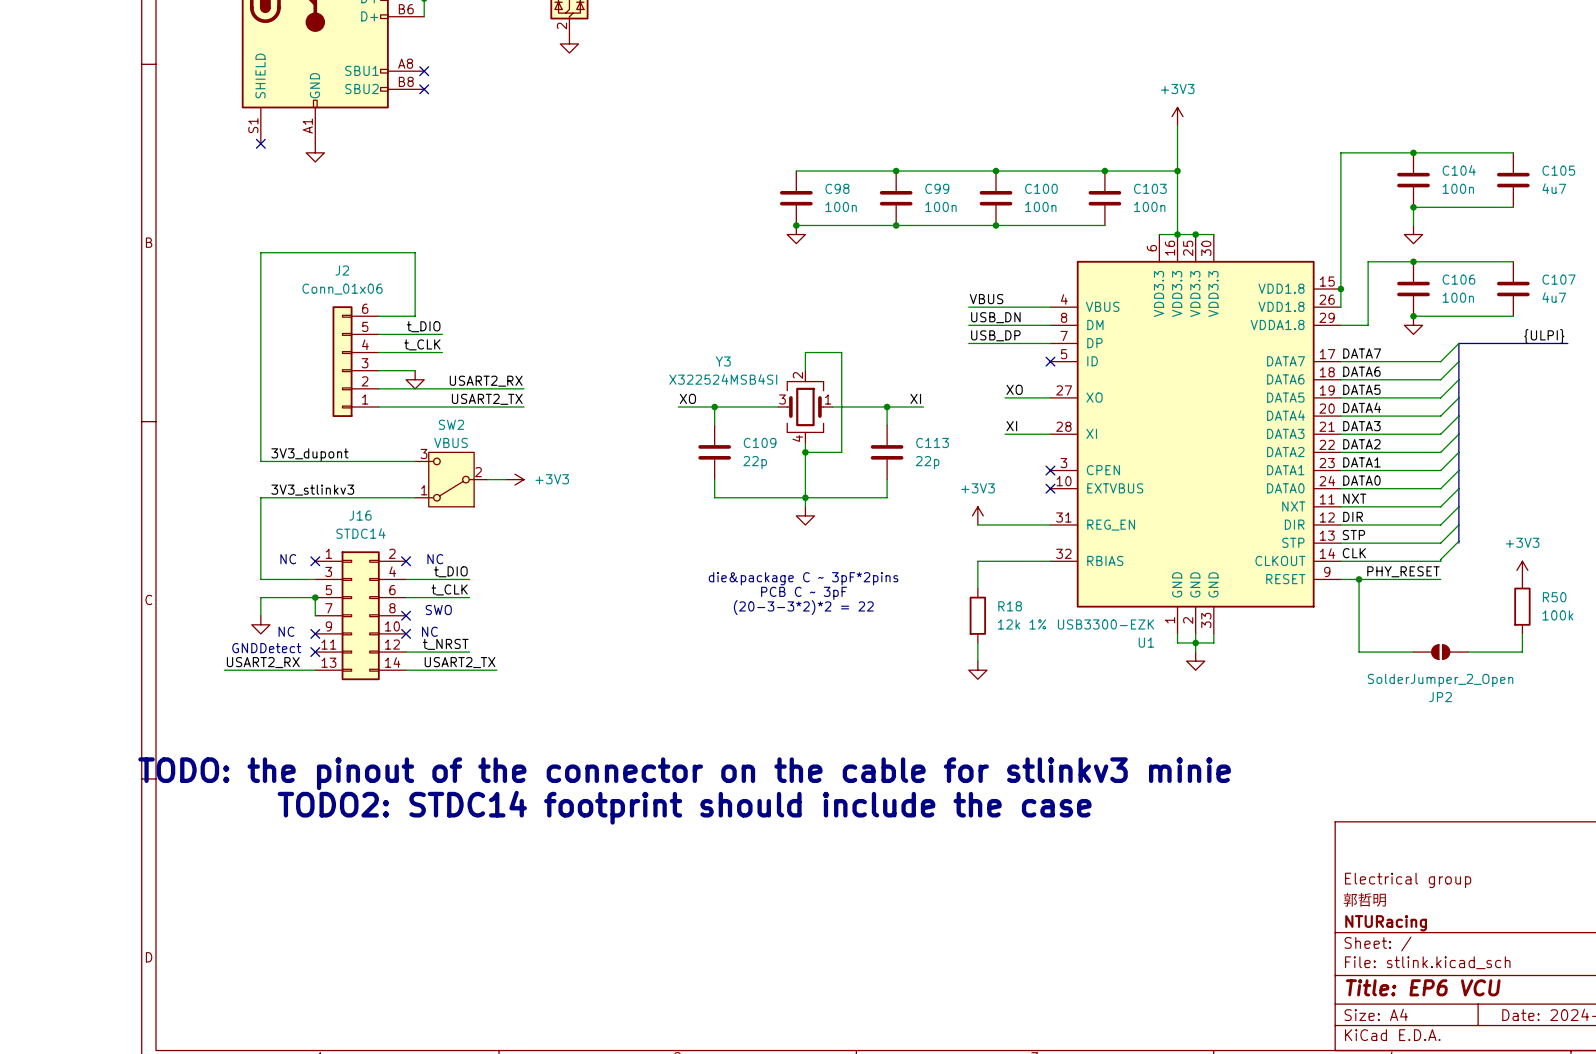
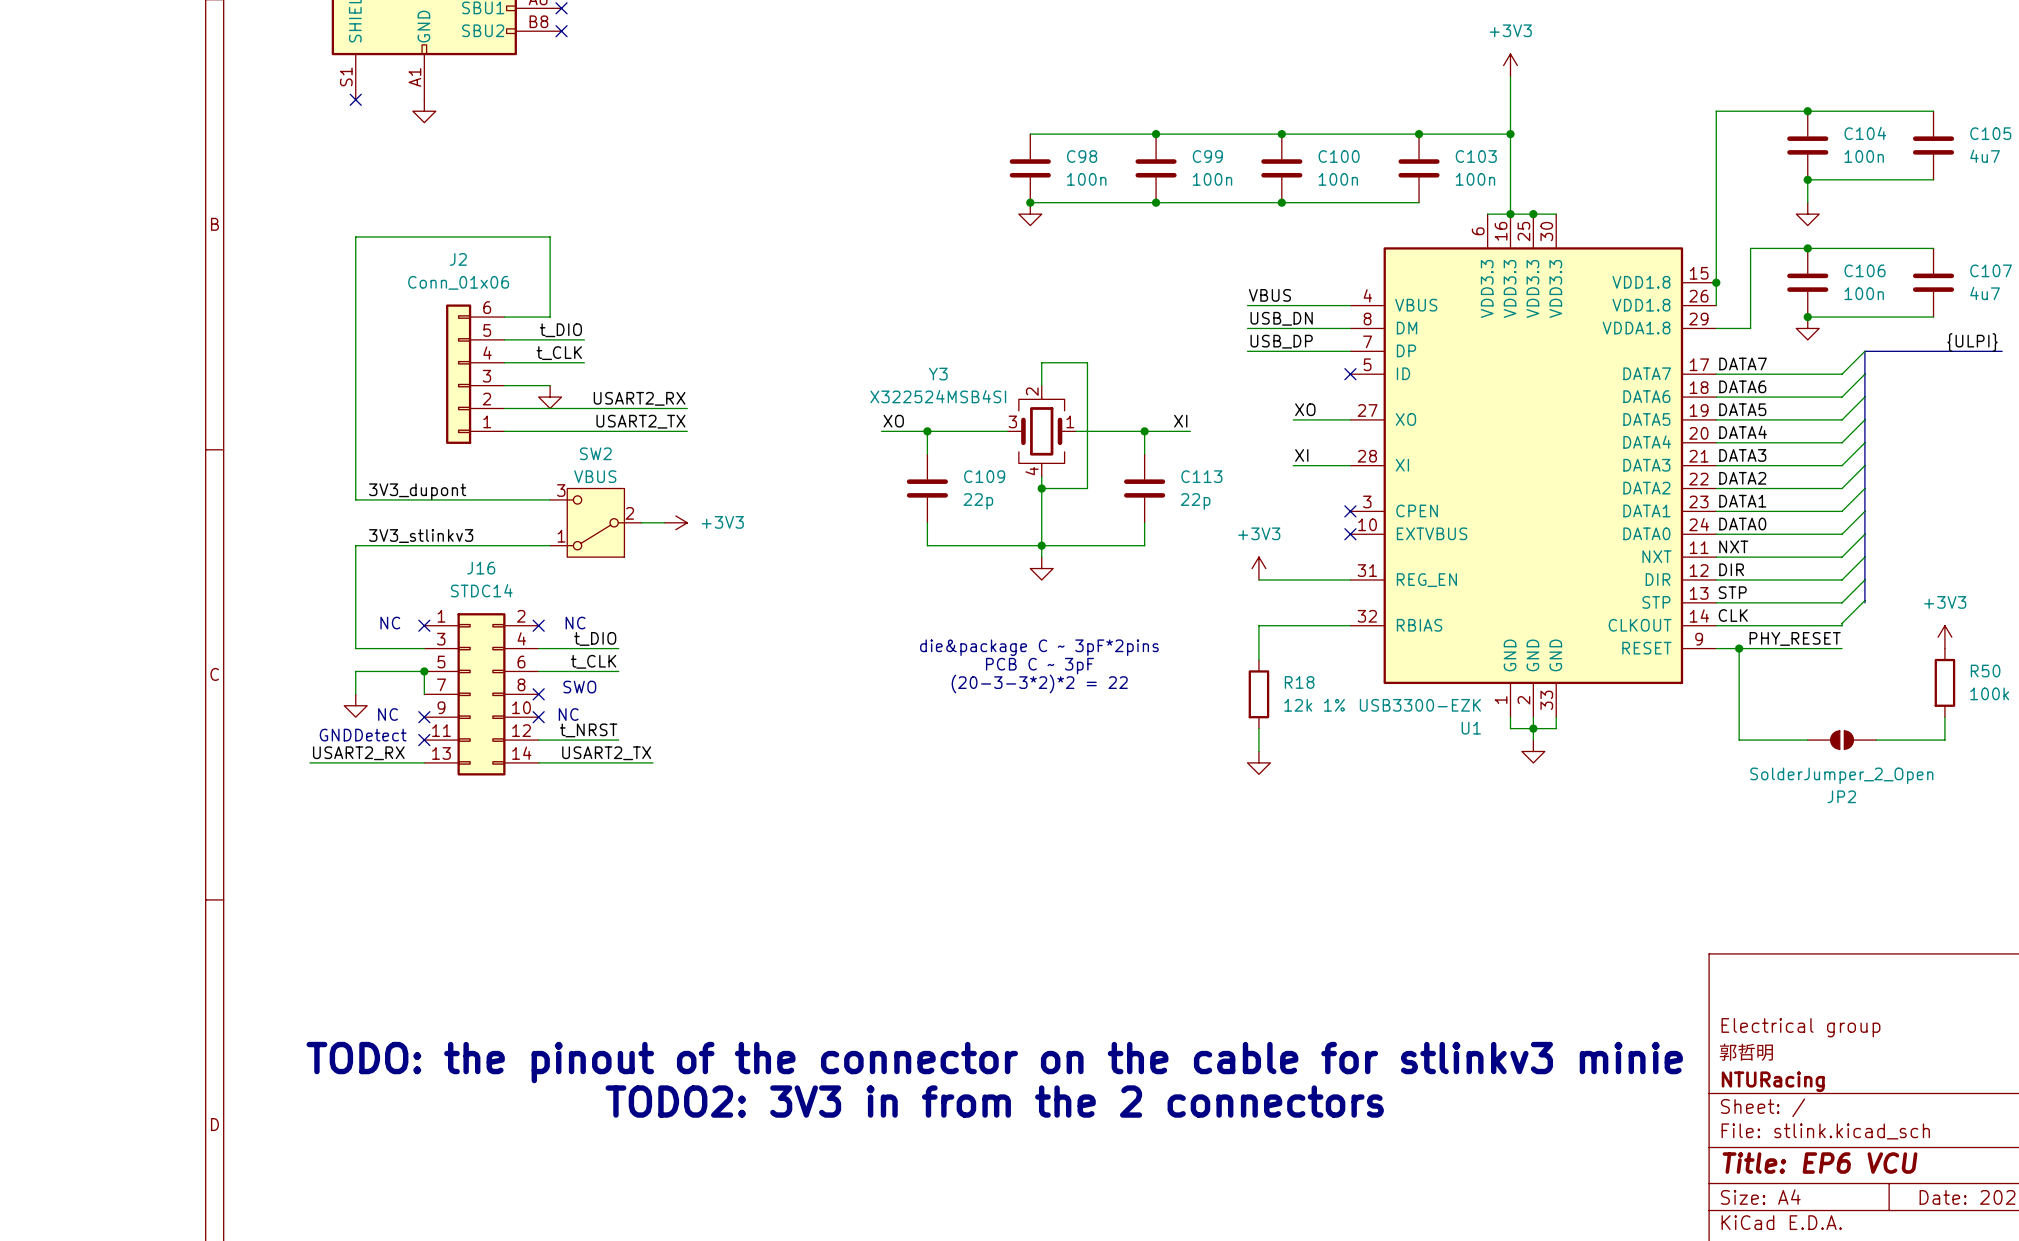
text position: TODO: the pinout of the connector on the cable for stlinkv3 minie (684, 773) -> TODO: the pinout of the connector on the cable for stlinkv3 minie (994, 1062)
text: TODO2: STDC14 footprint should include the case (684, 807) -> none
text: none -> TODO2: 3V3 in from the 2 connectors (994, 1101)

